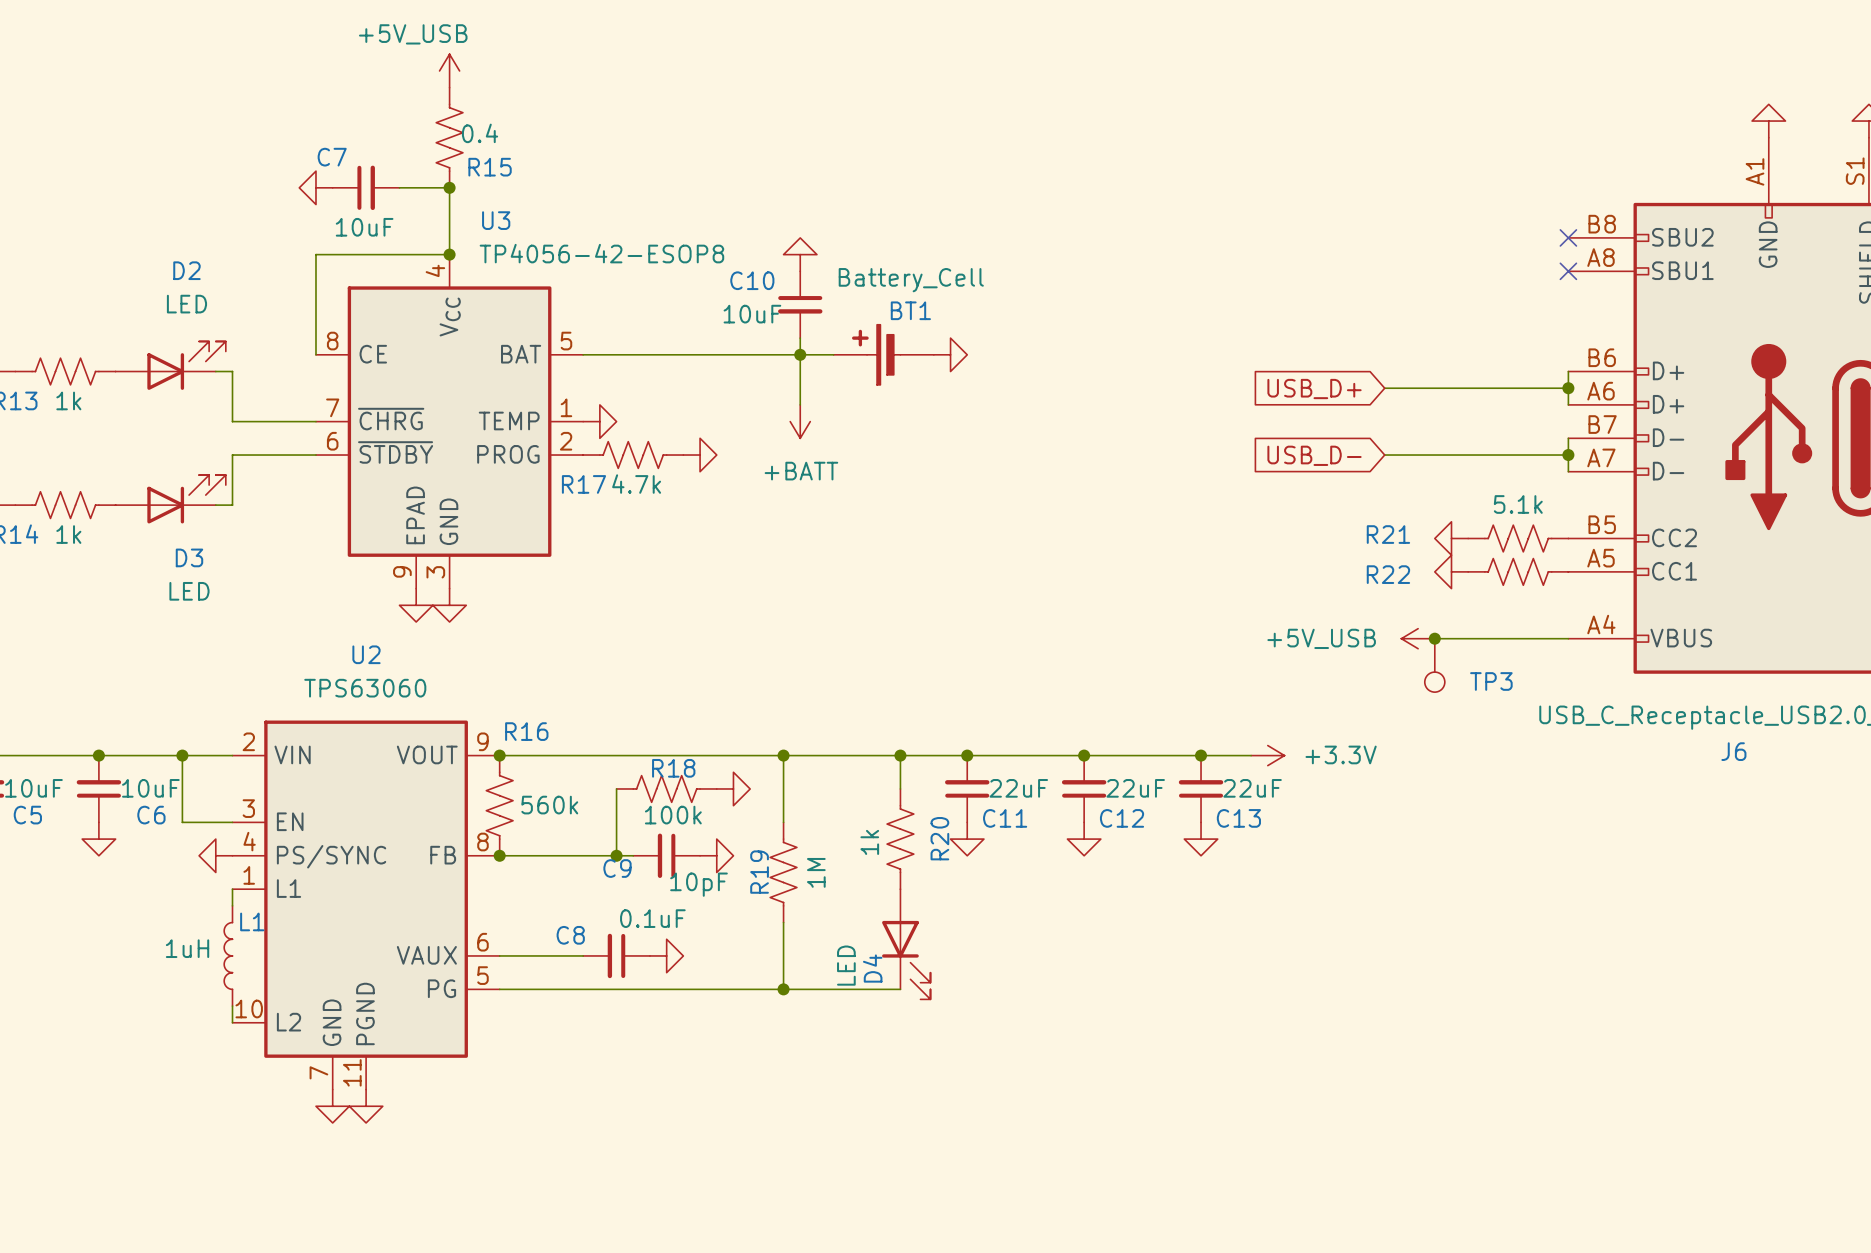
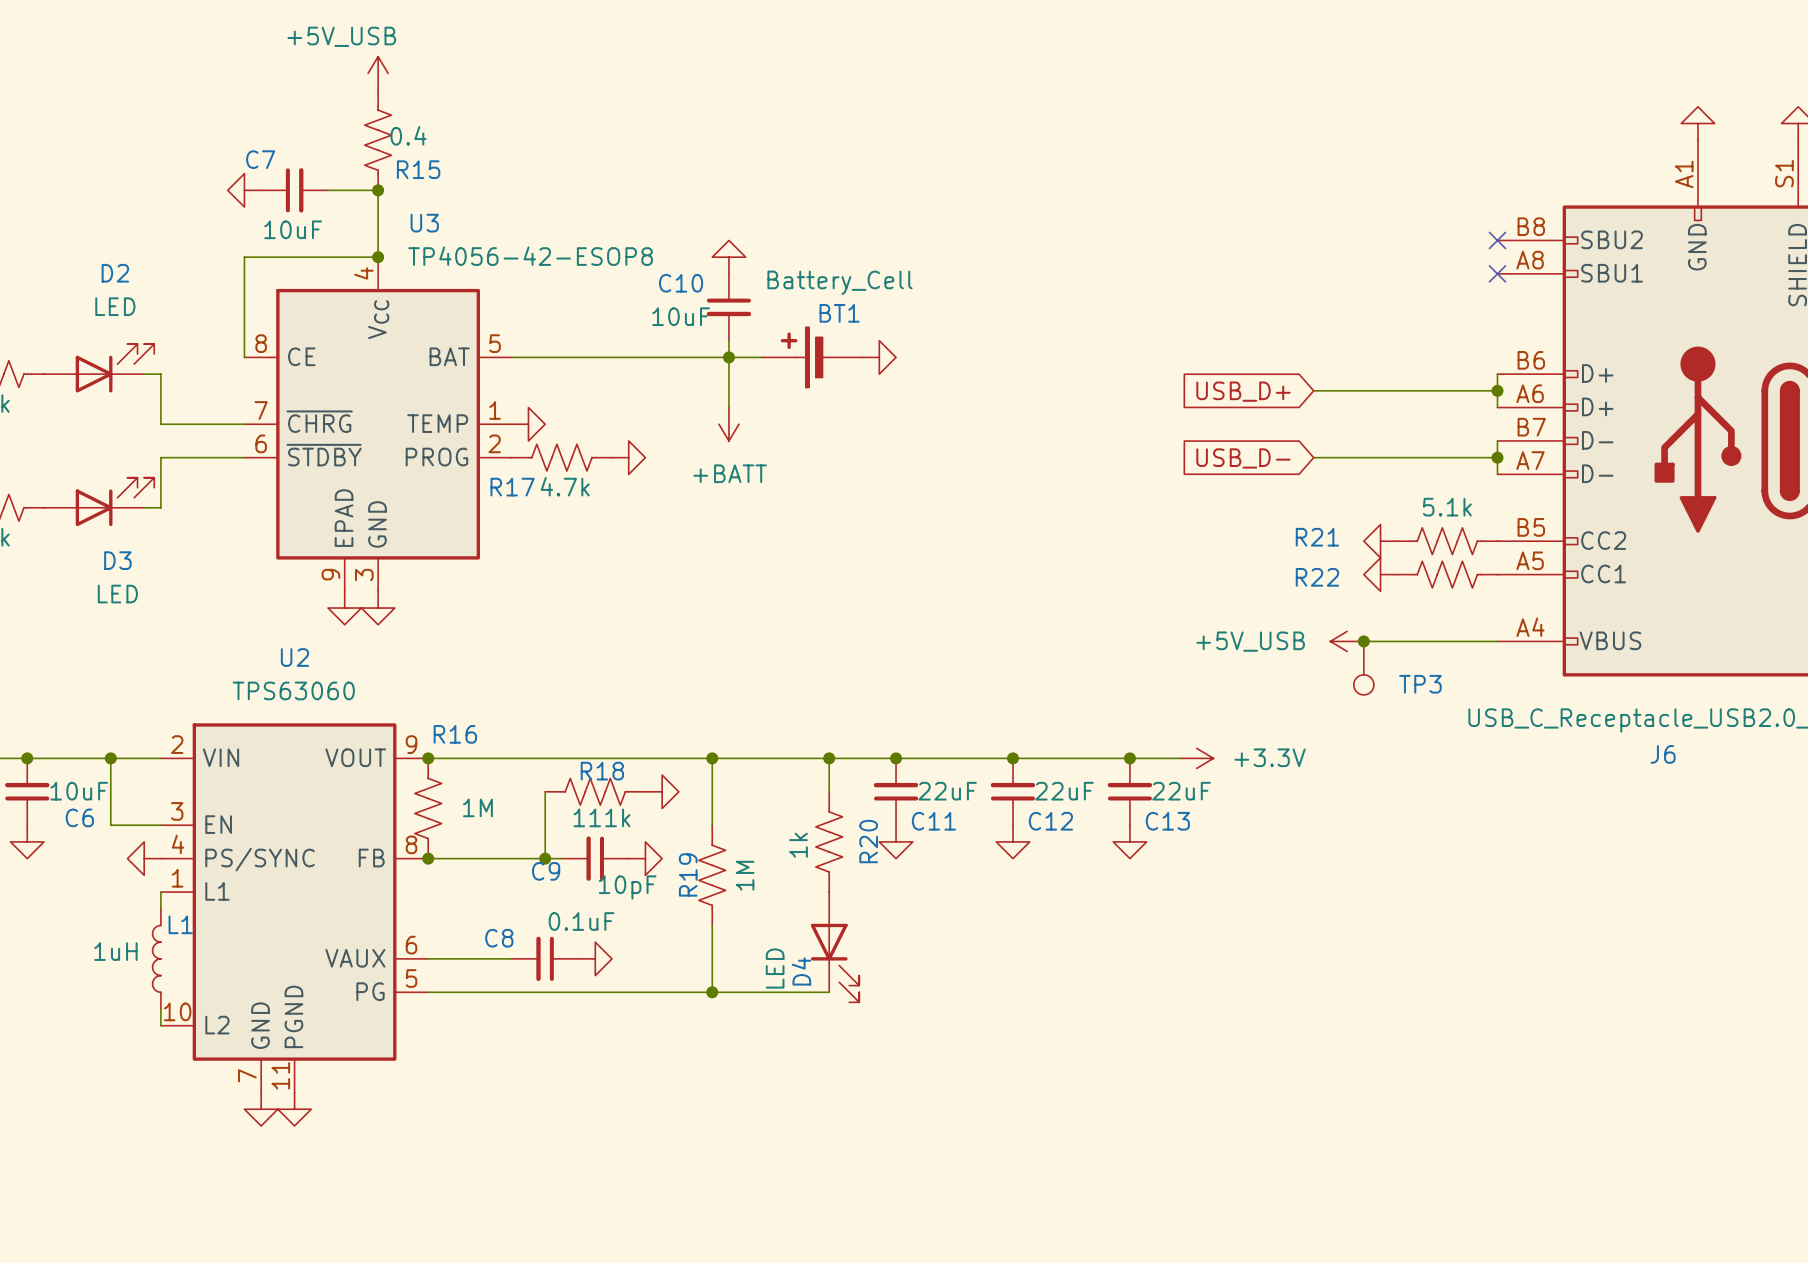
R16 value: 560k (549, 805) -> 1M (477, 807)
R18 value: 100k (673, 815) -> 111k (601, 817)

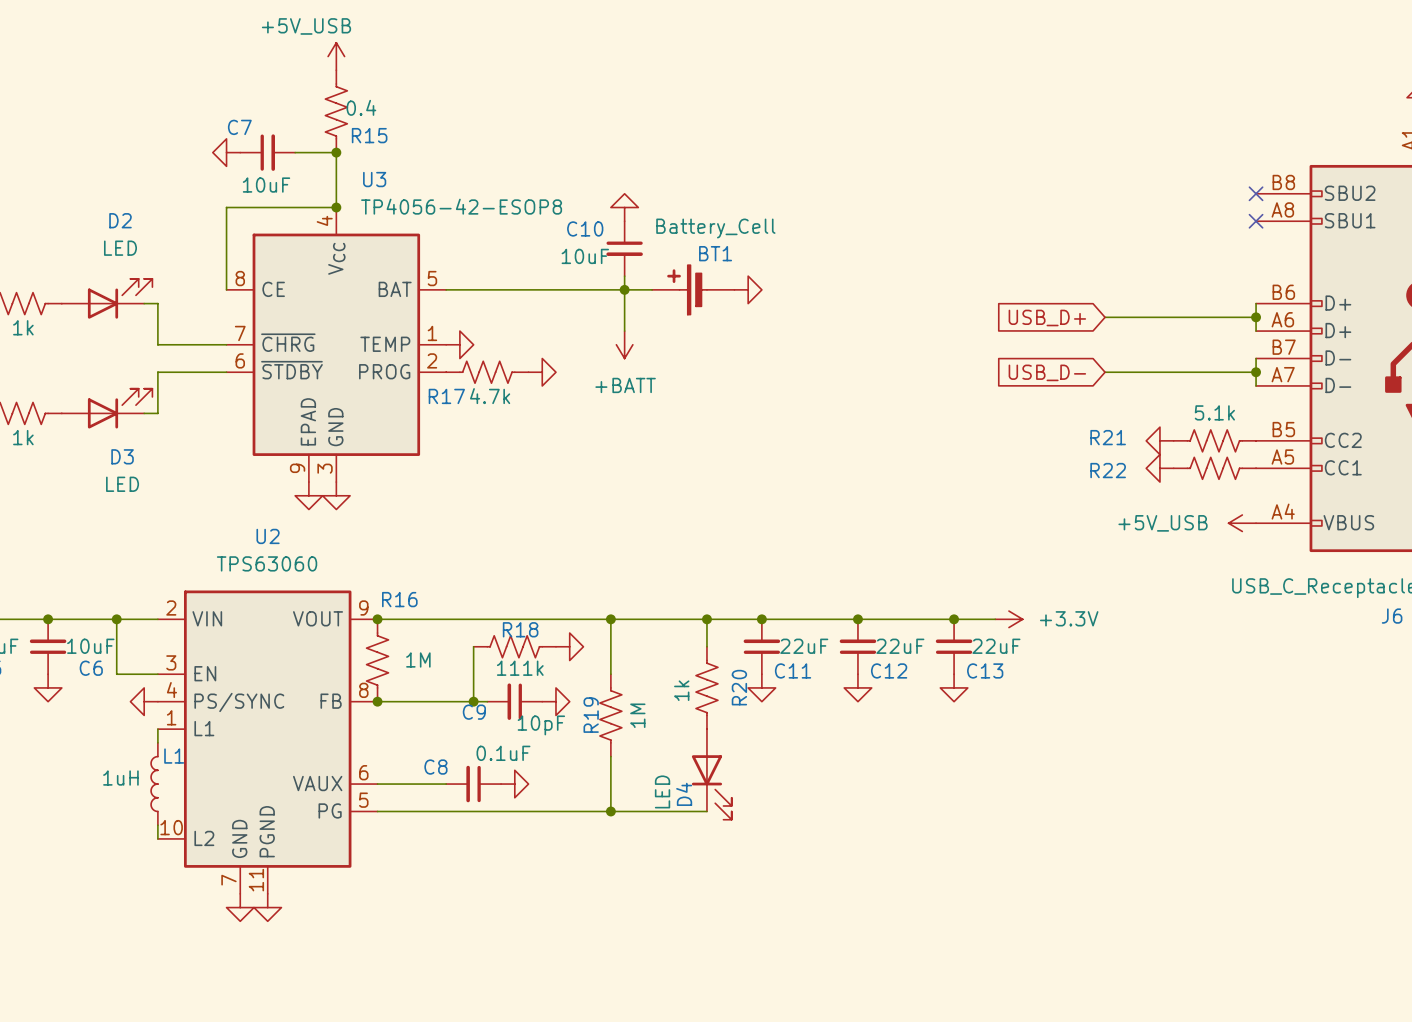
power symbol position: +5V_USB (1347, 641) -> +5V_USB (1242, 523)
wire: (1363, 641) (1497, 641) -> none
junction: (1363, 641) -> none
TP3: (1363, 668) -> none

